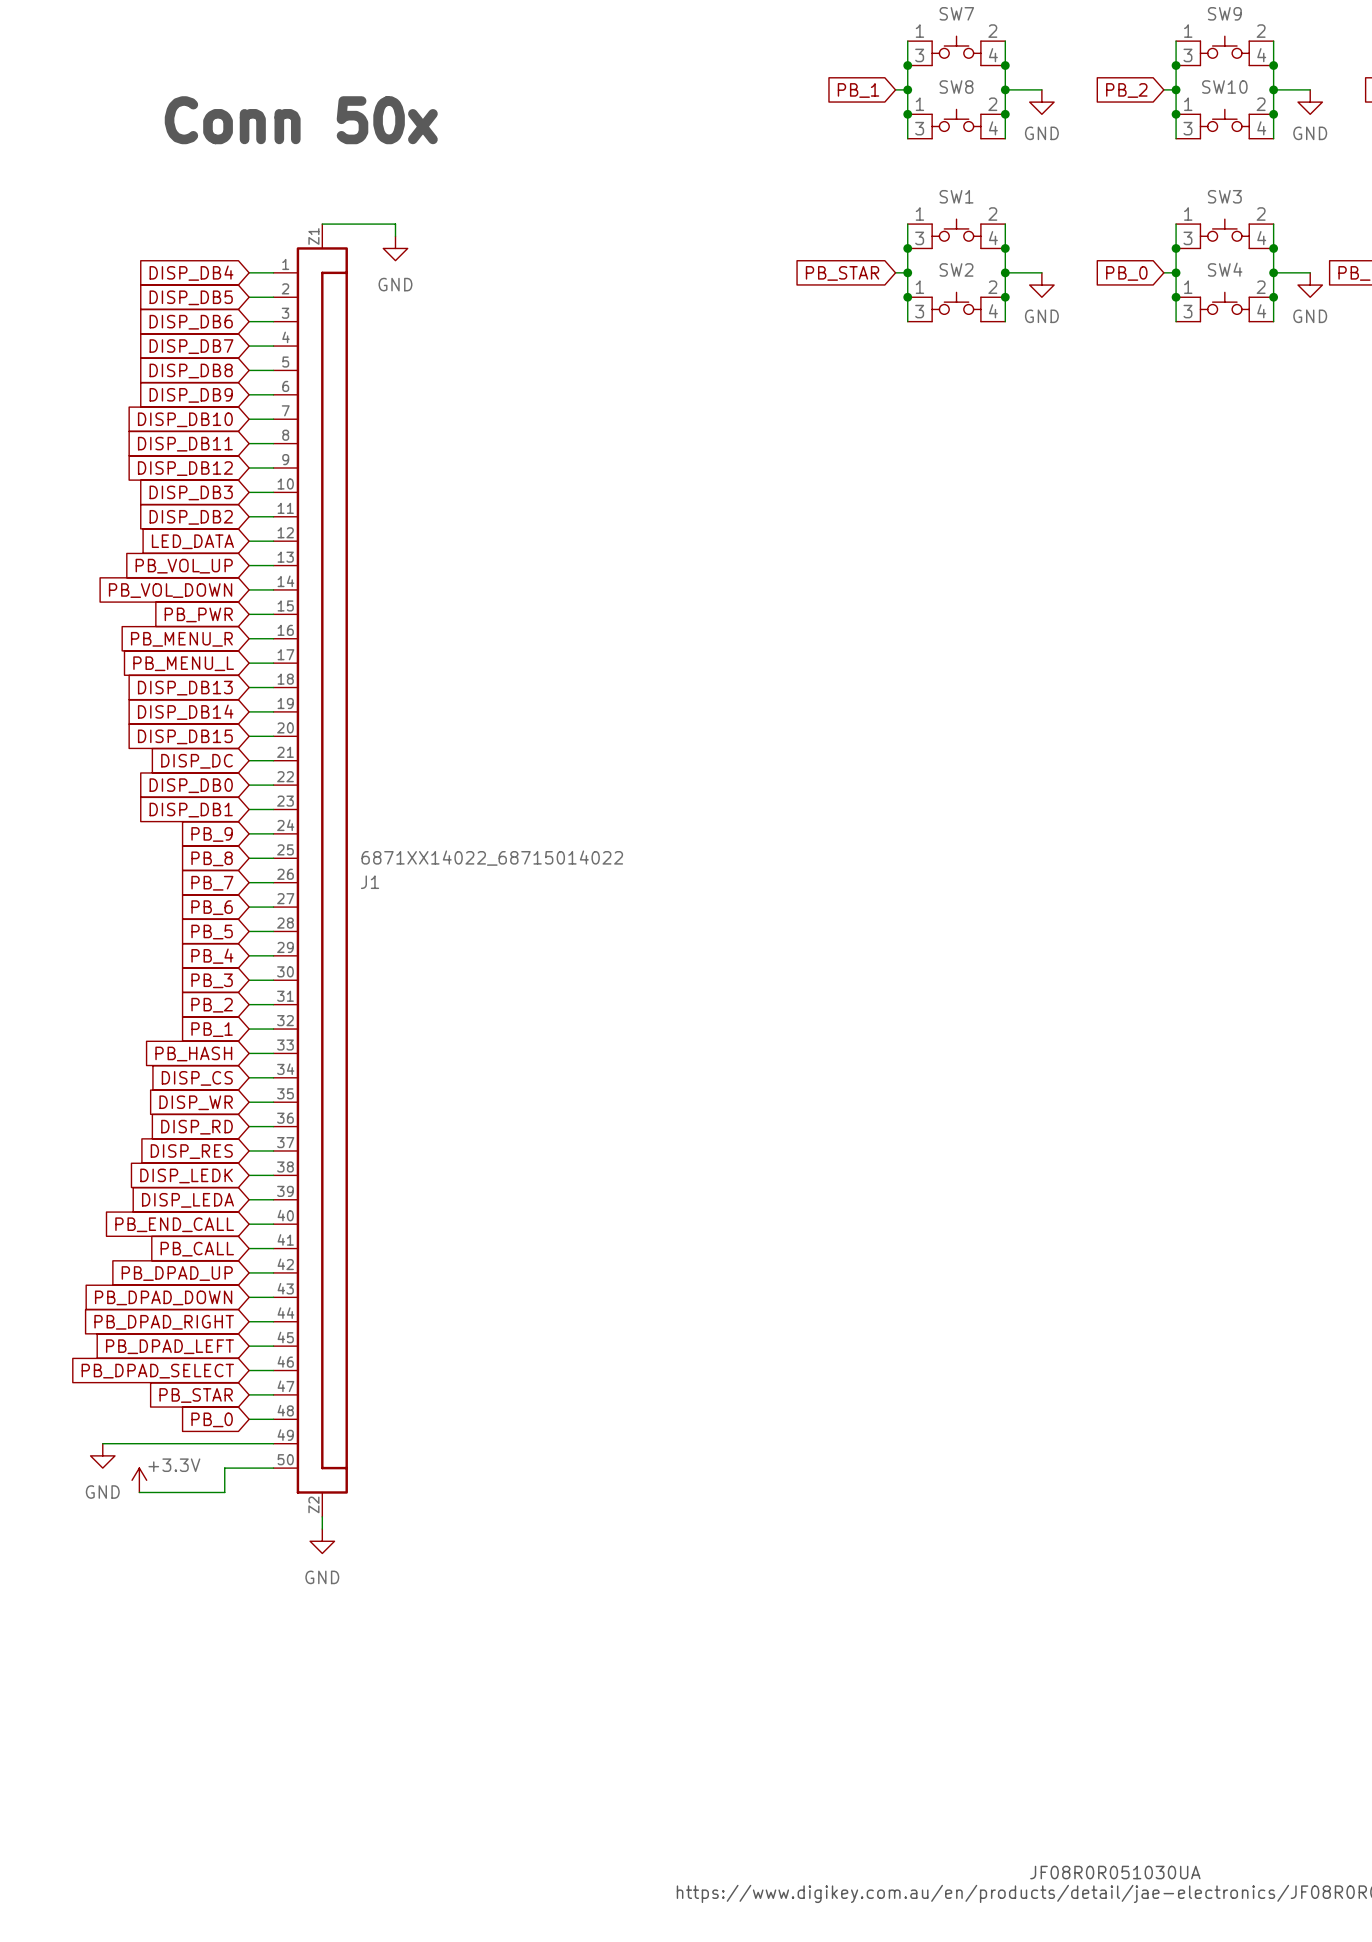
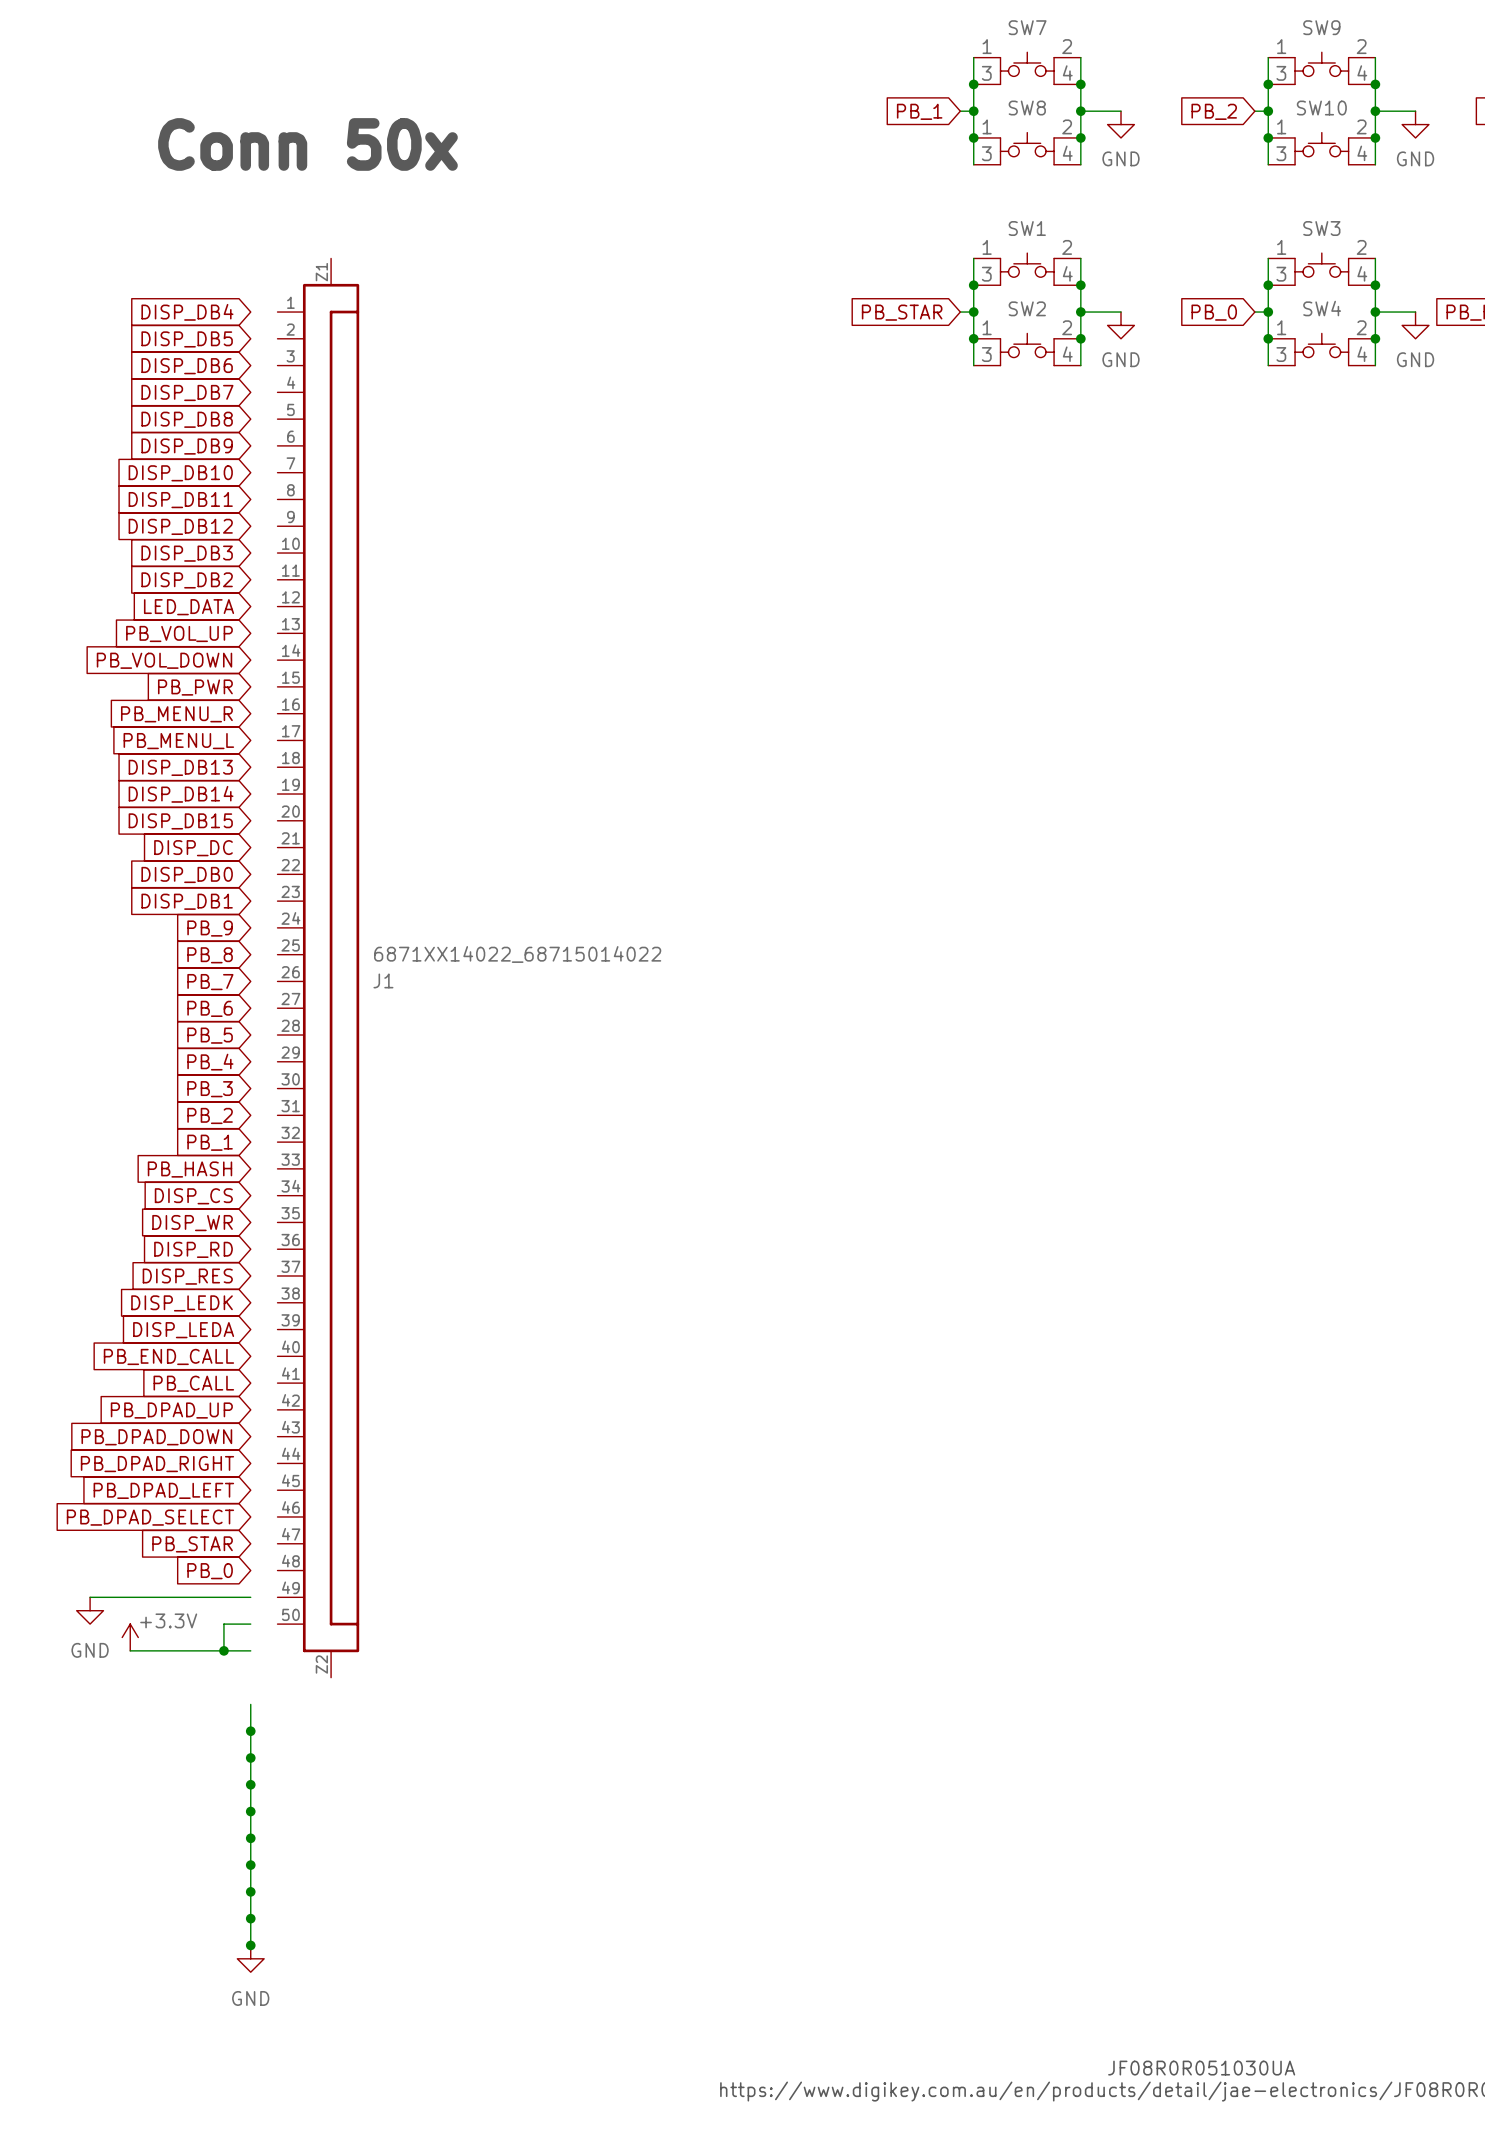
wire: (322, 224) (395, 224) (395, 236) -> none
power symbol: GND (395, 248) -> none
wire: (249, 272) (273, 272) -> none
wire: (249, 297) (273, 297) -> none
wire: (249, 321) (273, 321) -> none
wire: (249, 346) (273, 346) -> none
wire: (249, 370) (273, 370) -> none
wire: (249, 394) (273, 394) -> none
wire: (249, 419) (273, 419) -> none
wire: (249, 443) (273, 443) -> none
wire: (249, 467) (273, 467) -> none
wire: (249, 492) (273, 492) -> none
wire: (249, 516) (273, 516) -> none
wire: (249, 541) (273, 541) -> none
wire: (249, 565) (273, 565) -> none
wire: (249, 589) (273, 589) -> none
wire: (249, 614) (273, 614) -> none
wire: (249, 638) (273, 638) -> none
wire: (249, 663) (273, 663) -> none
wire: (249, 687) (273, 687) -> none
wire: (249, 711) (273, 711) -> none
wire: (249, 736) (273, 736) -> none
wire: (249, 760) (273, 760) -> none
wire: (249, 785) (273, 785) -> none
wire: (249, 809) (273, 809) -> none
wire: (249, 833) (273, 833) -> none
wire: (249, 858) (273, 858) -> none
wire: (249, 882) (273, 882) -> none
wire: (249, 907) (273, 907) -> none
wire: (249, 931) (273, 931) -> none
wire: (249, 955) (273, 955) -> none
wire: (249, 980) (273, 980) -> none
wire: (249, 1004) (273, 1004) -> none
wire: (249, 1029) (273, 1029) -> none
wire: (249, 1053) (273, 1053) -> none
wire: (249, 1077) (273, 1077) -> none
wire: (249, 1102) (273, 1102) -> none
wire: (249, 1126) (273, 1126) -> none
wire: (249, 1150) (273, 1150) -> none
wire: (249, 1175) (273, 1175) -> none
wire: (249, 1199) (273, 1199) -> none
wire: (249, 1224) (273, 1224) -> none
wire: (249, 1248) (273, 1248) -> none
wire: (249, 1272) (273, 1272) -> none
wire: (249, 1297) (273, 1297) -> none
wire: (249, 1321) (273, 1321) -> none
wire: (249, 1346) (273, 1346) -> none
wire: (249, 1370) (273, 1370) -> none
wire: (249, 1394) (273, 1394) -> none
wire: (249, 1419) (273, 1419) -> none
wire: (249, 1443) (273, 1443) -> none
wire: (249, 1468) (273, 1468) -> (223, 1650) (250, 1650)
junction: none -> (223, 1650)
wire: (322, 1516) (322, 1529) -> none
wire: none -> (250, 1704) (250, 1945)
power symbol: GND (322, 1541) -> none
junction: none -> (250, 1731)
junction: none -> (250, 1757)
junction: none -> (250, 1784)
junction: none -> (250, 1811)
junction: none -> (250, 1838)
junction: none -> (250, 1865)
junction: none -> (250, 1891)
junction: none -> (250, 1918)
junction: none -> (250, 1945)
power symbol: none -> GND (250, 1958)

